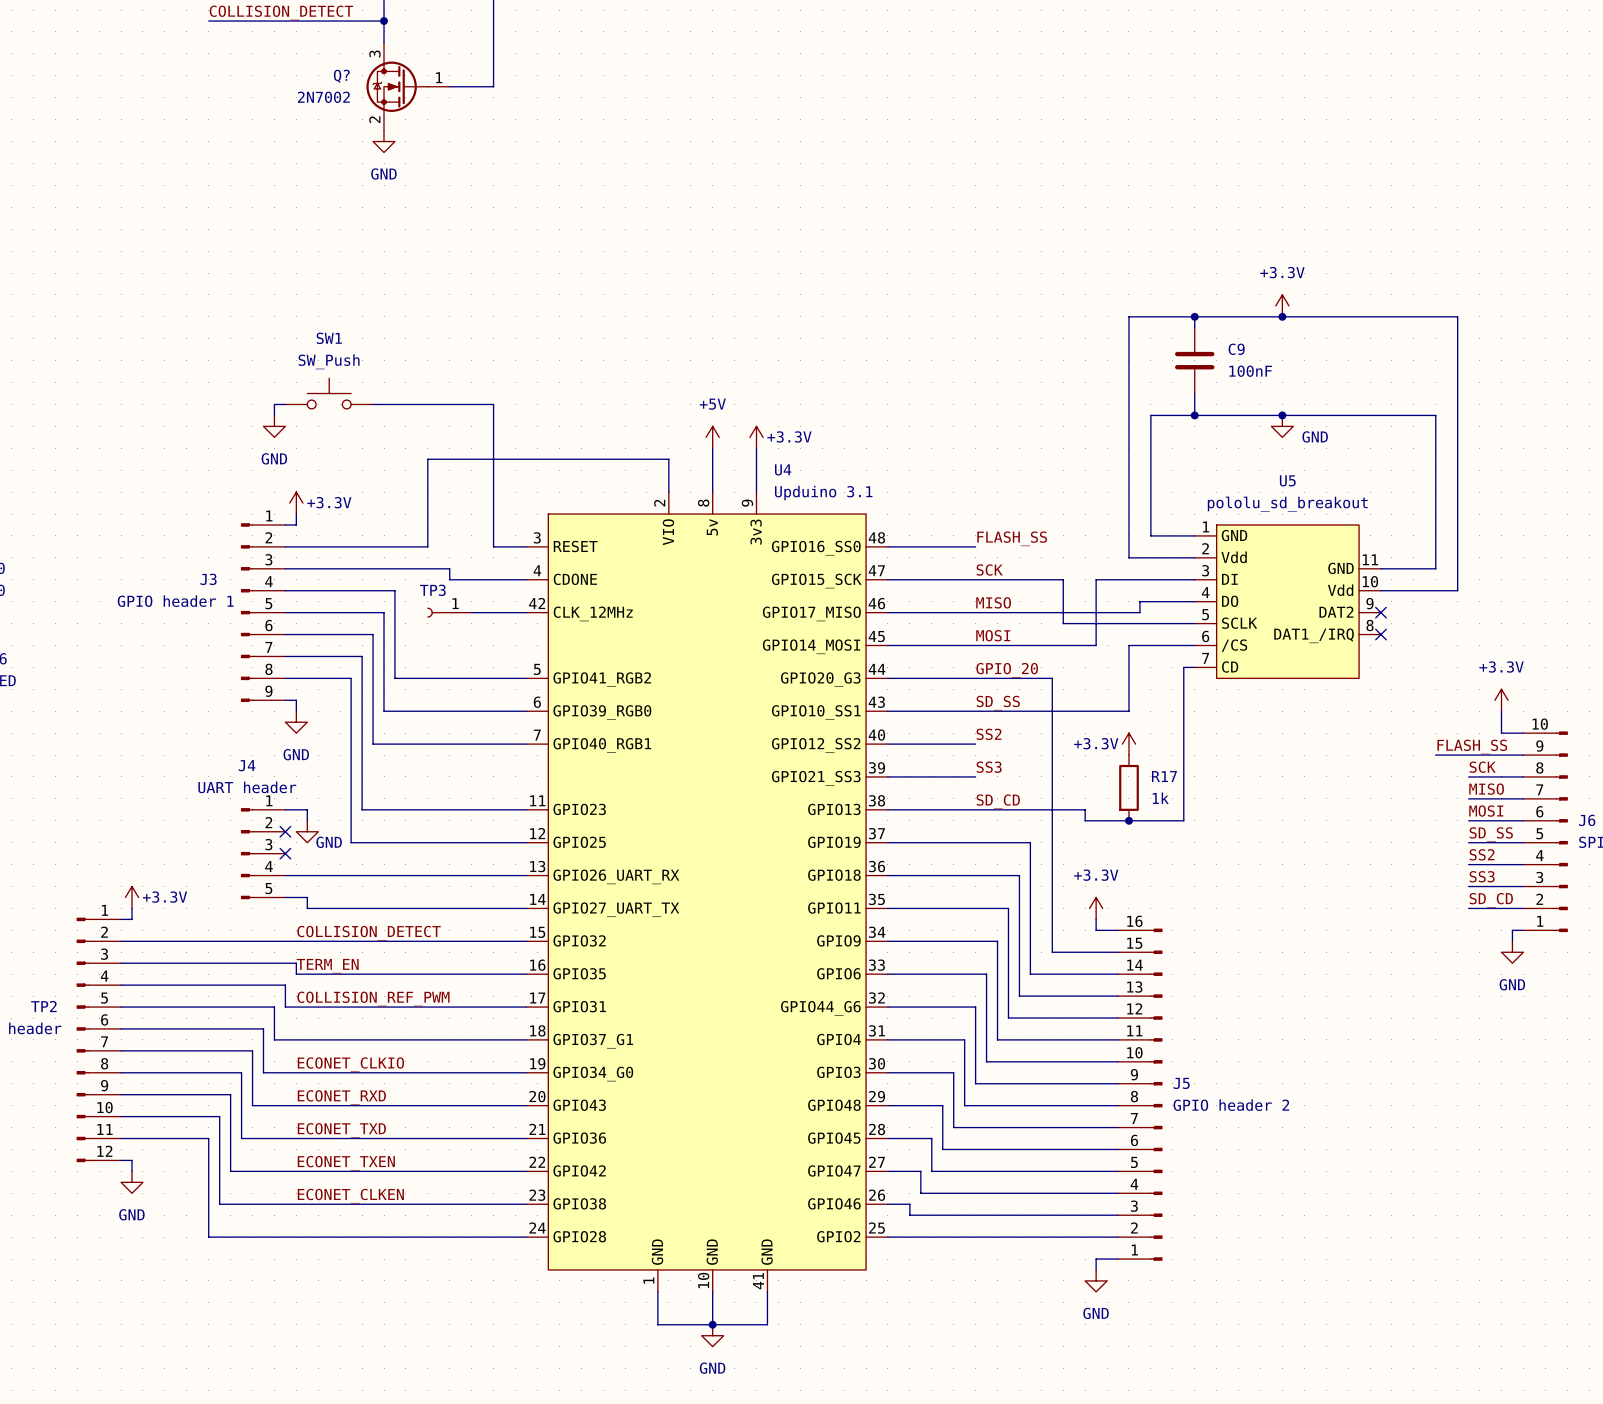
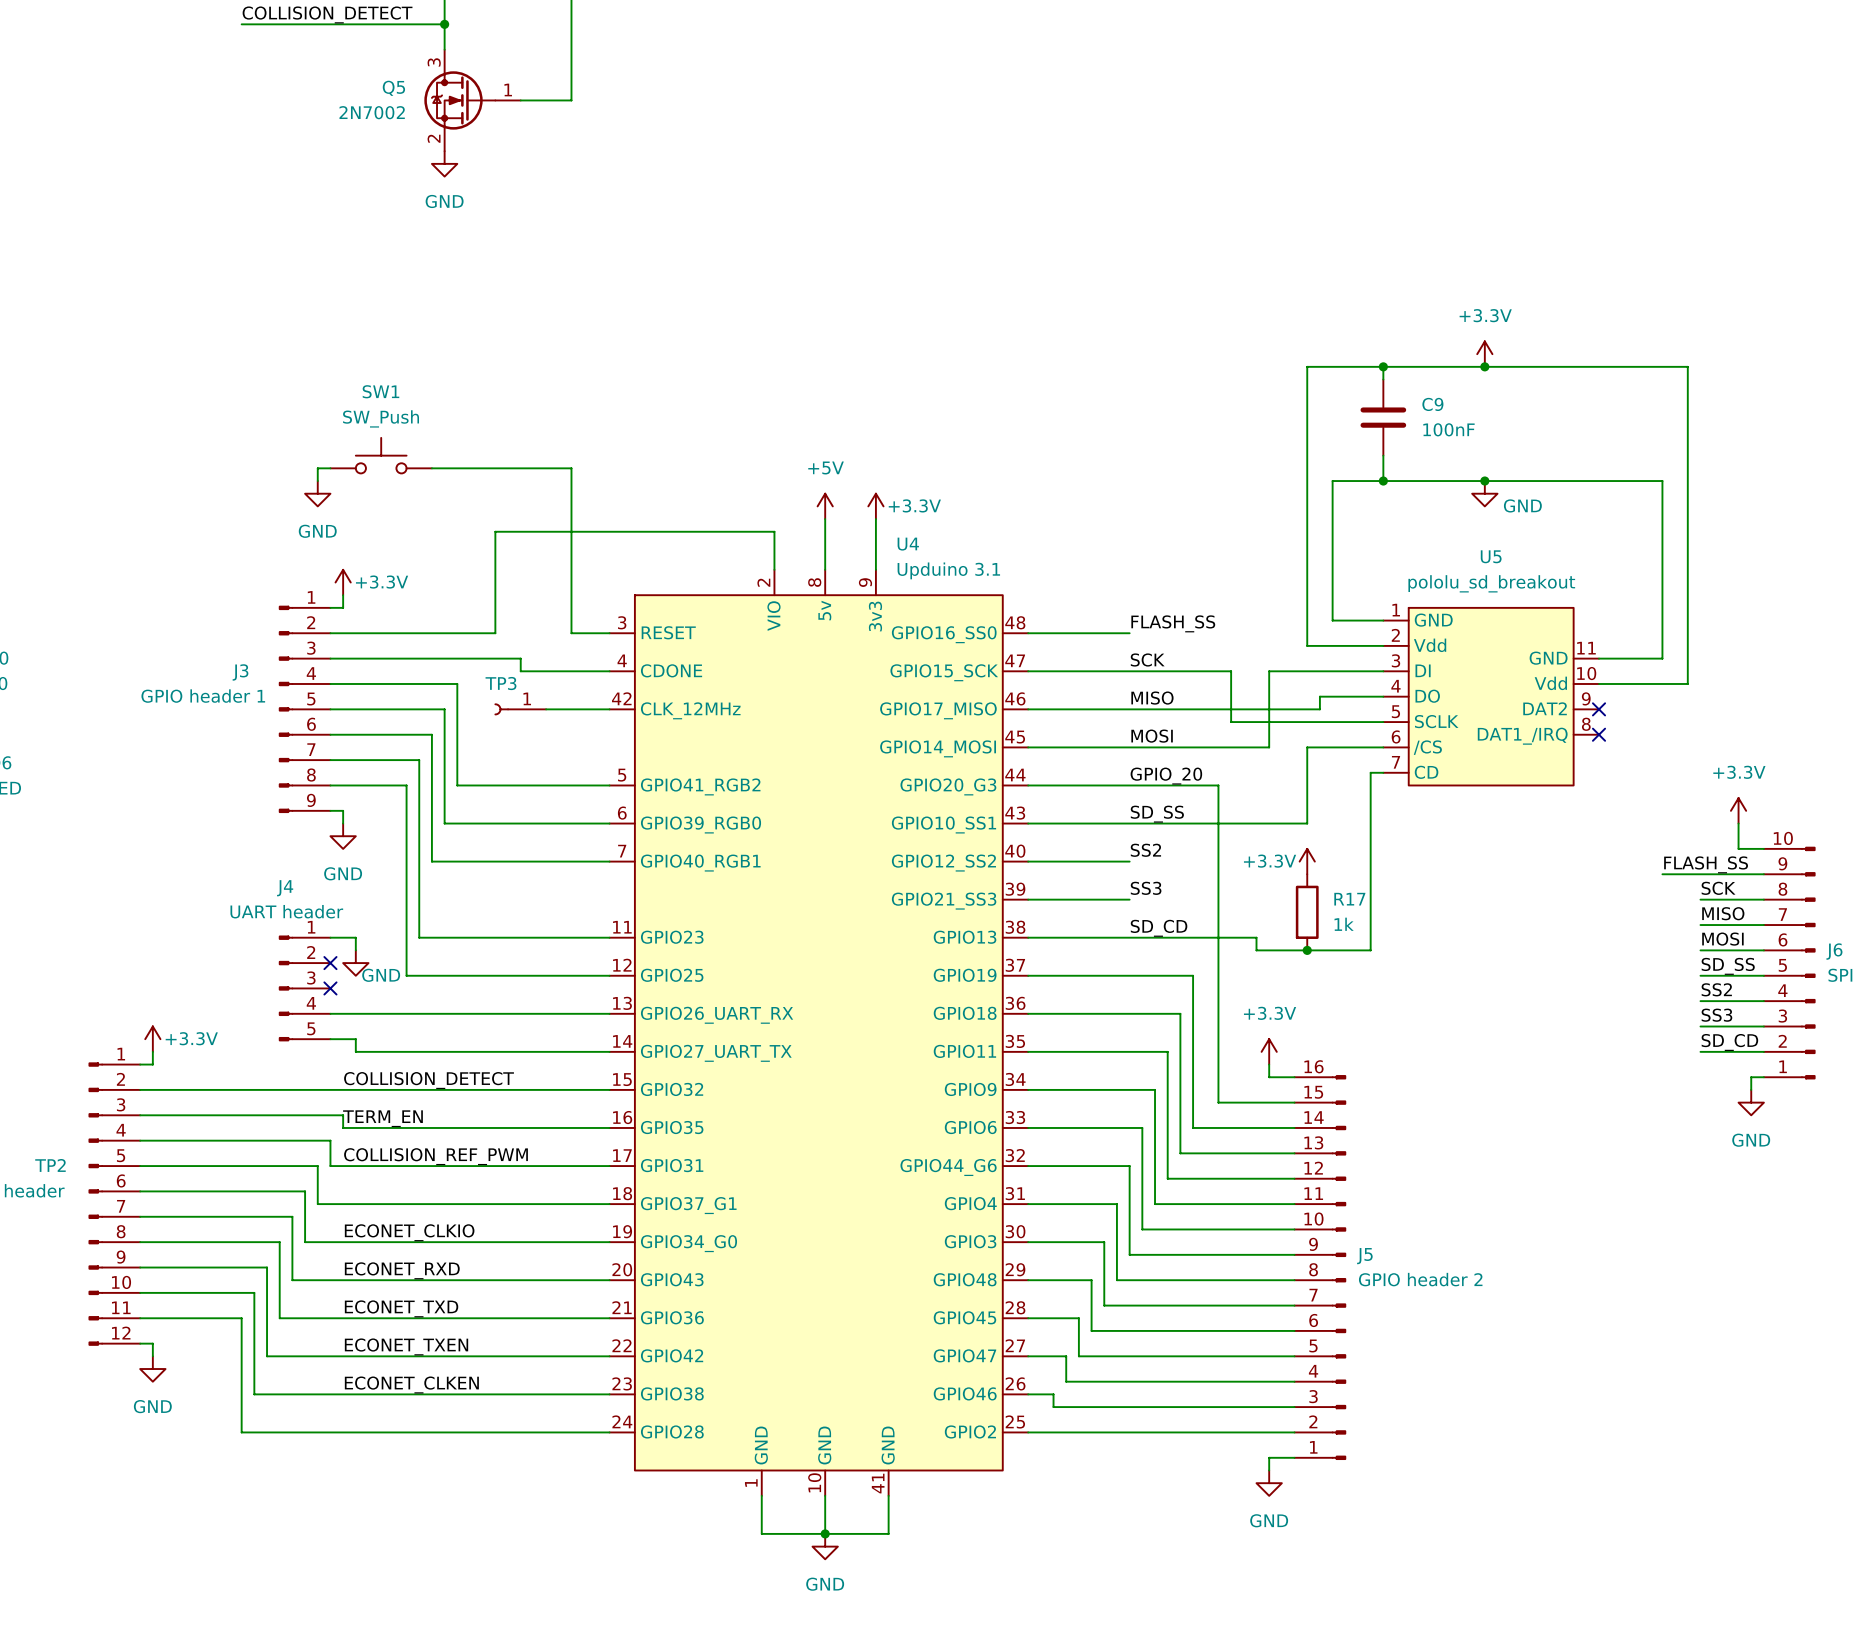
Q? name: Q? (341, 76) -> Q5 (393, 88)

